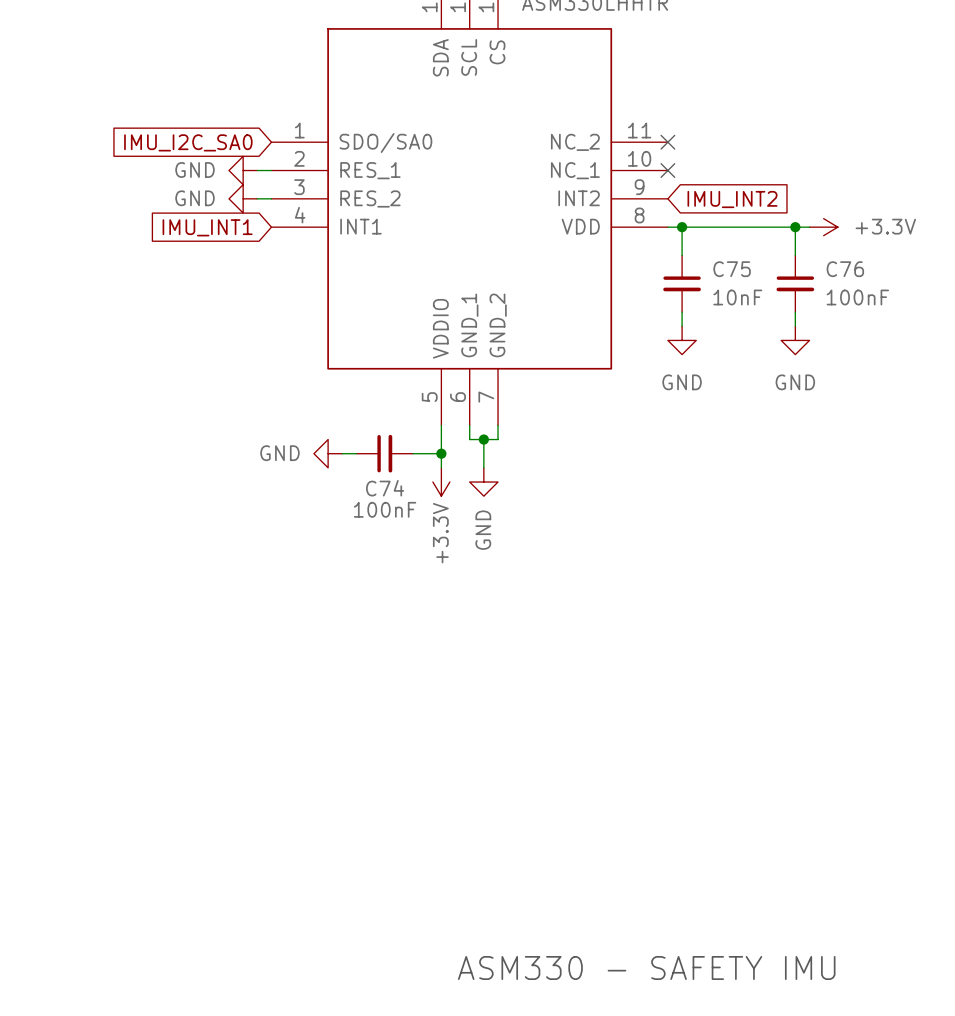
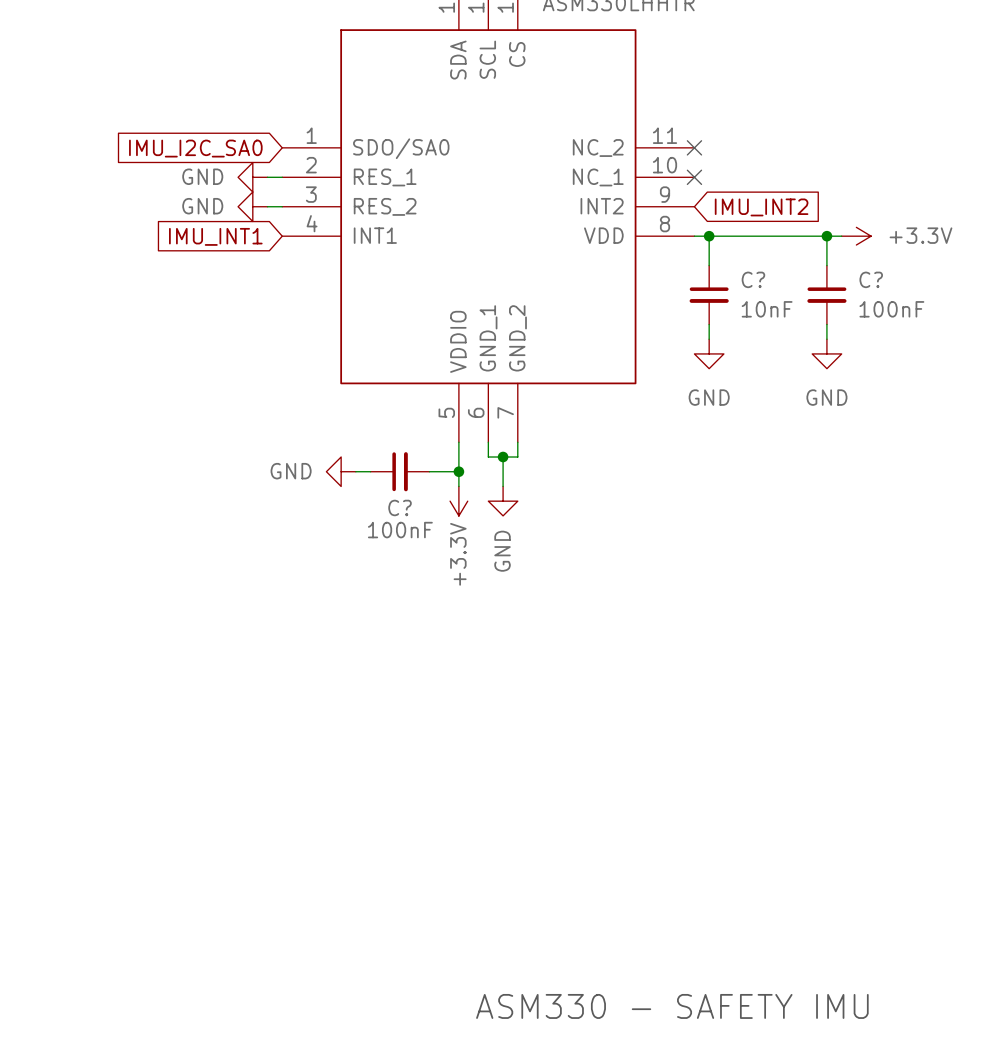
C75 name: C75 (732, 269) -> C? (753, 279)
C76 name: C76 (845, 269) -> C? (871, 279)
C74 name: C74 (385, 488) -> C? (400, 507)

